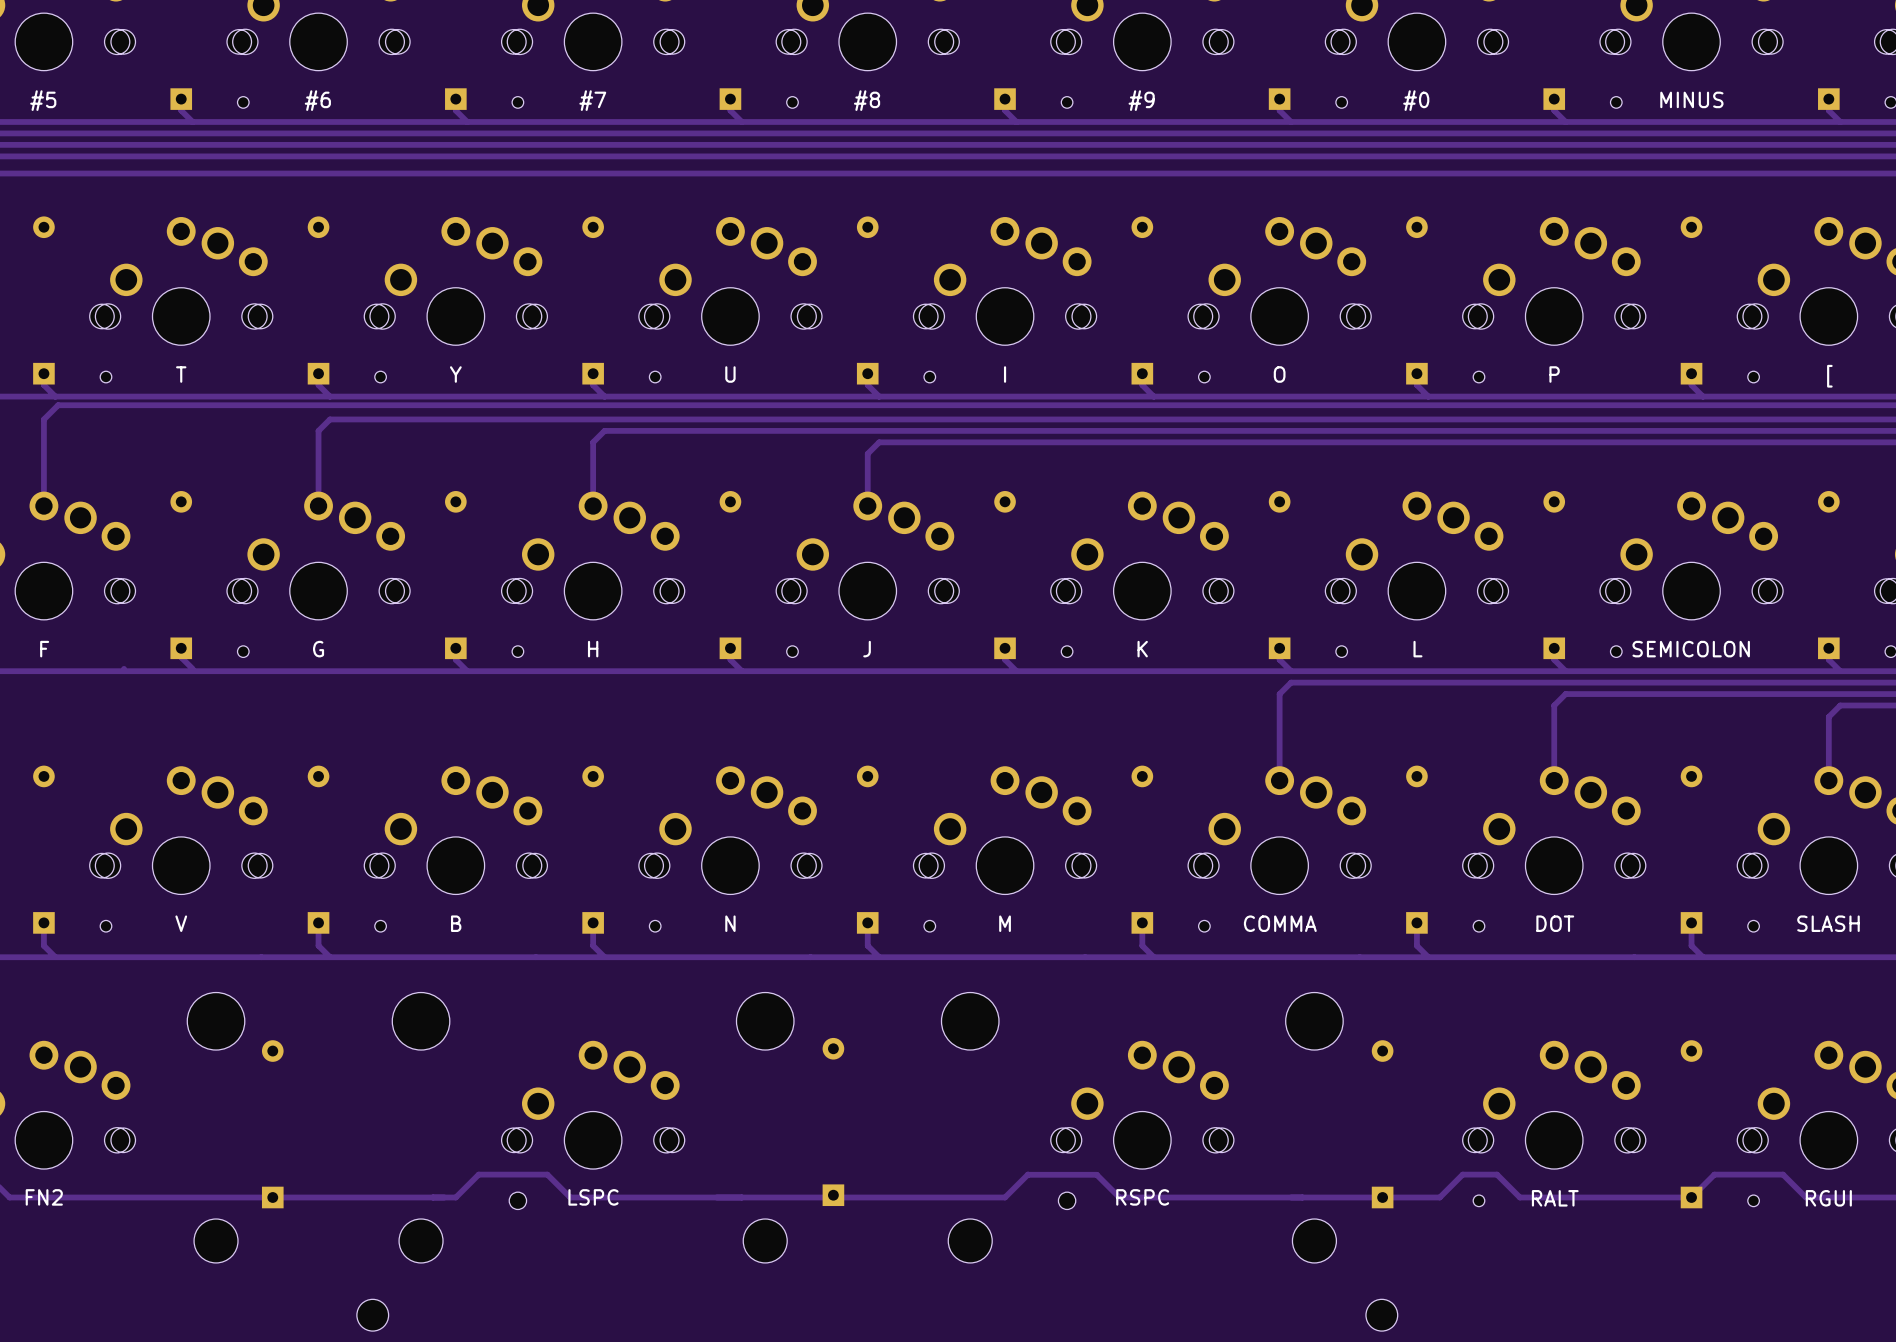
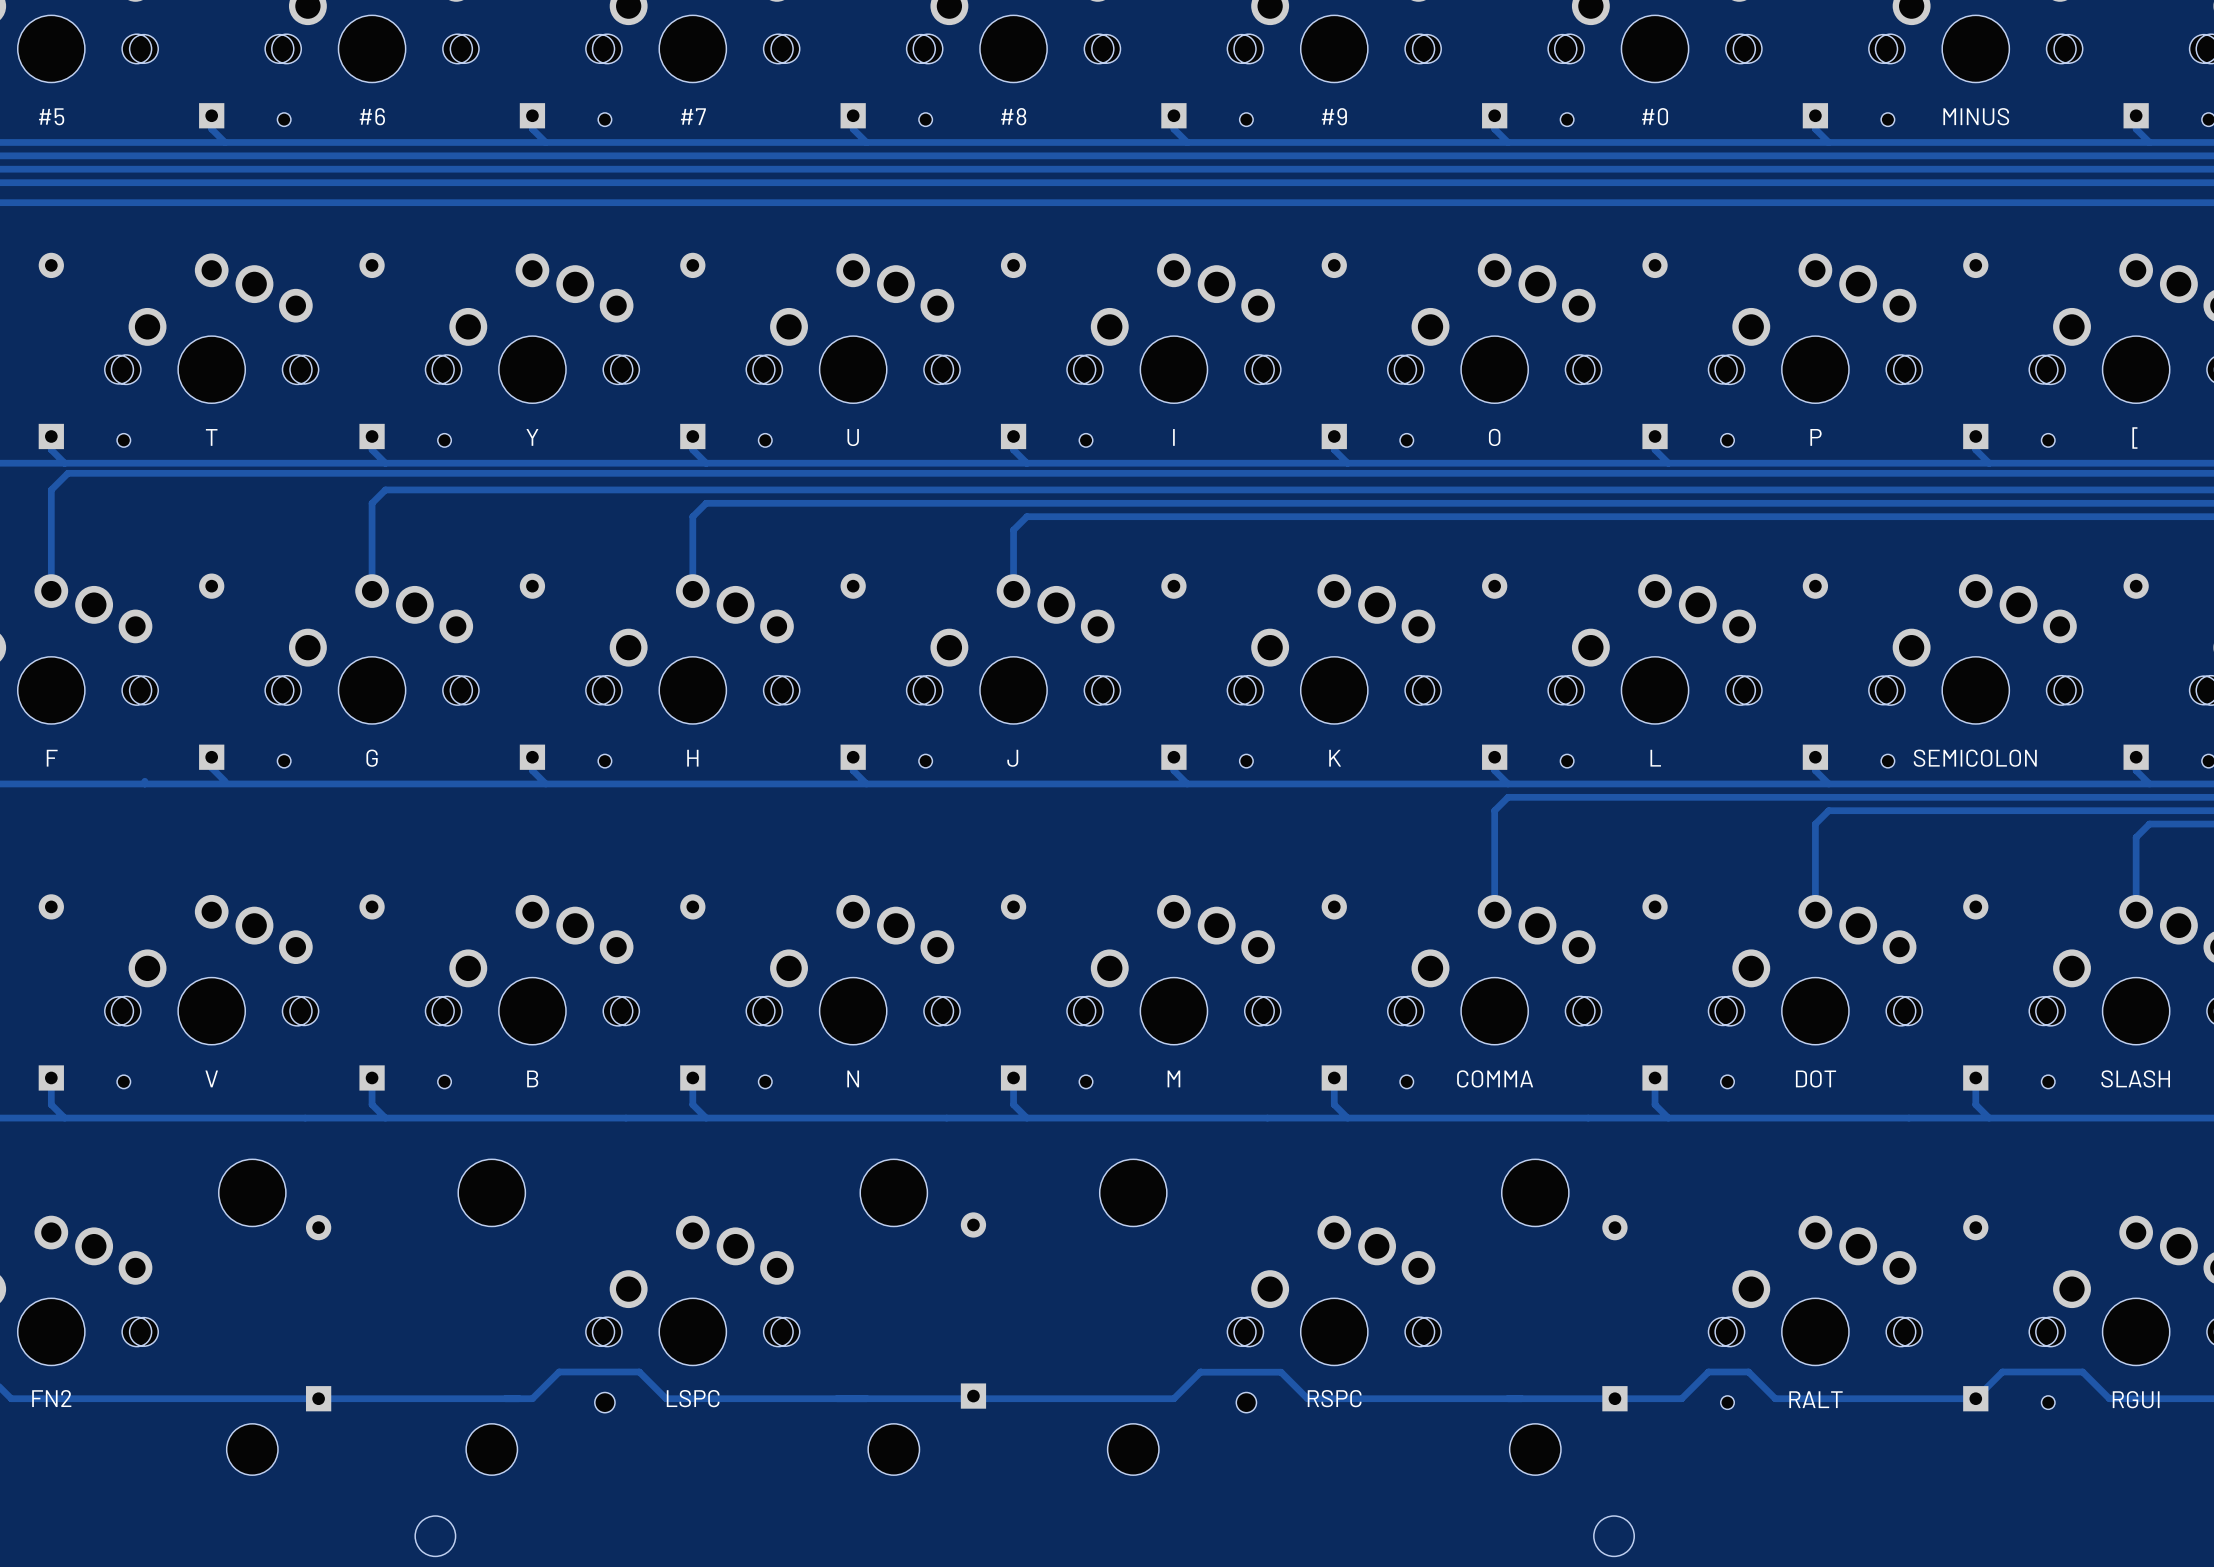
round board edge: none -> [414, 1515, 457, 1557]
round board edge: none -> [1593, 1515, 1635, 1557]
part: (372, 1315) -> none
part: (1381, 1315) -> none

